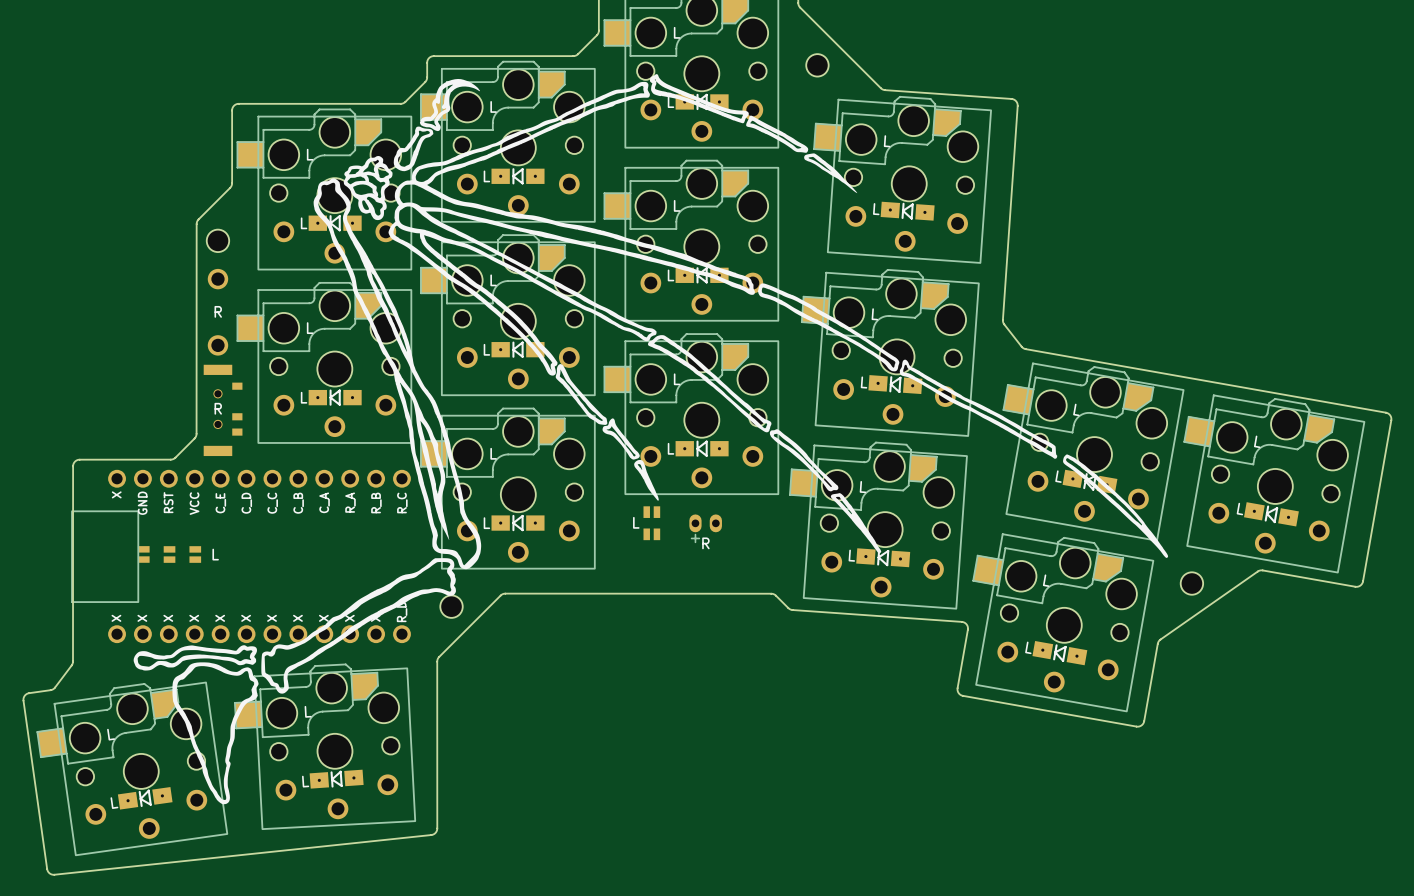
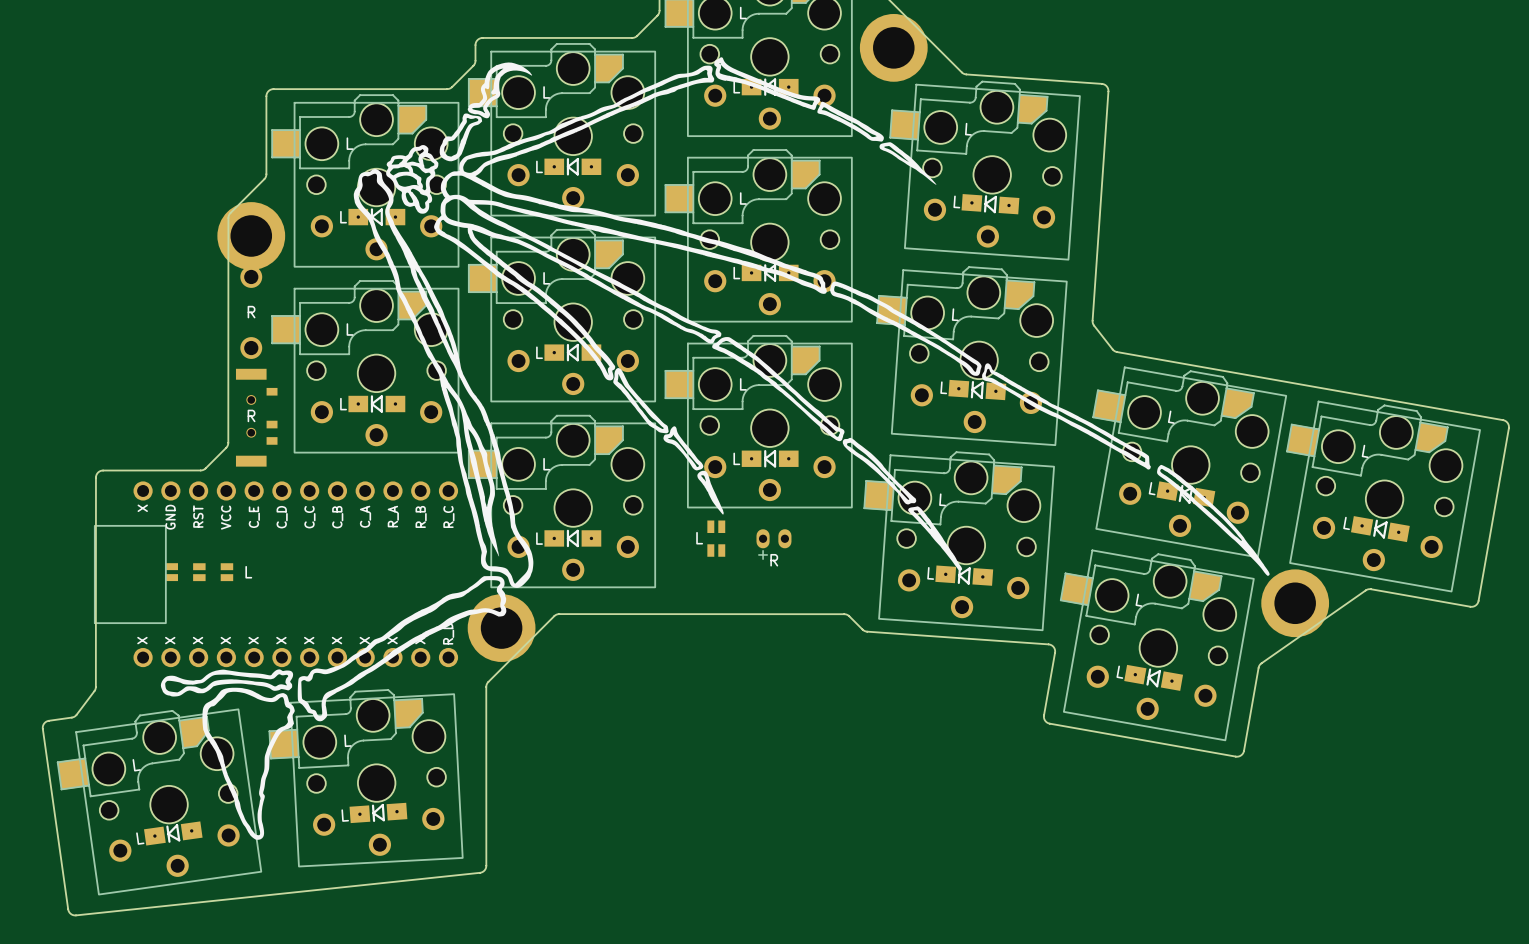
part footprint: [806, 54, 829, 77] -> [859, 13, 928, 82]
part footprint: [206, 229, 230, 253] -> [217, 202, 286, 270]
part footprint: [1180, 572, 1204, 595] -> [1261, 569, 1330, 638]
part footprint: [440, 595, 463, 618] -> [467, 594, 536, 662]

